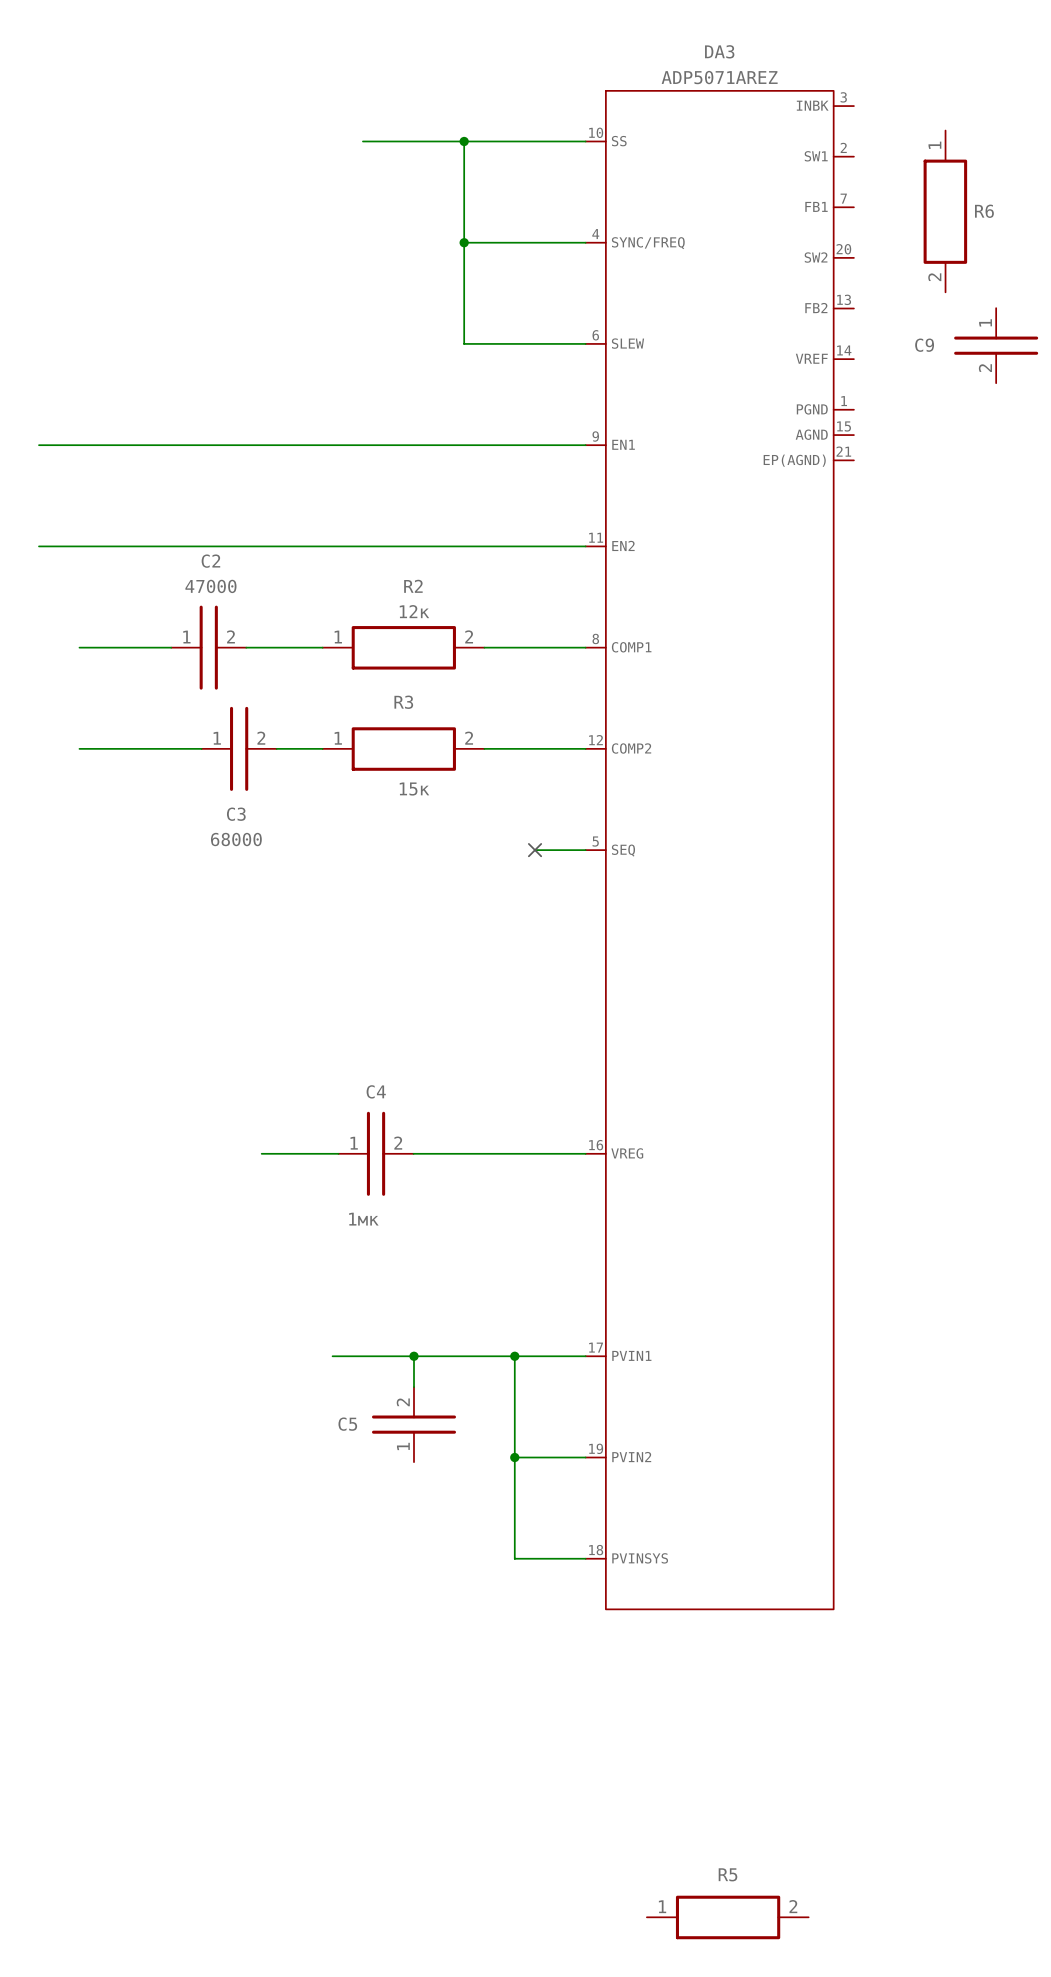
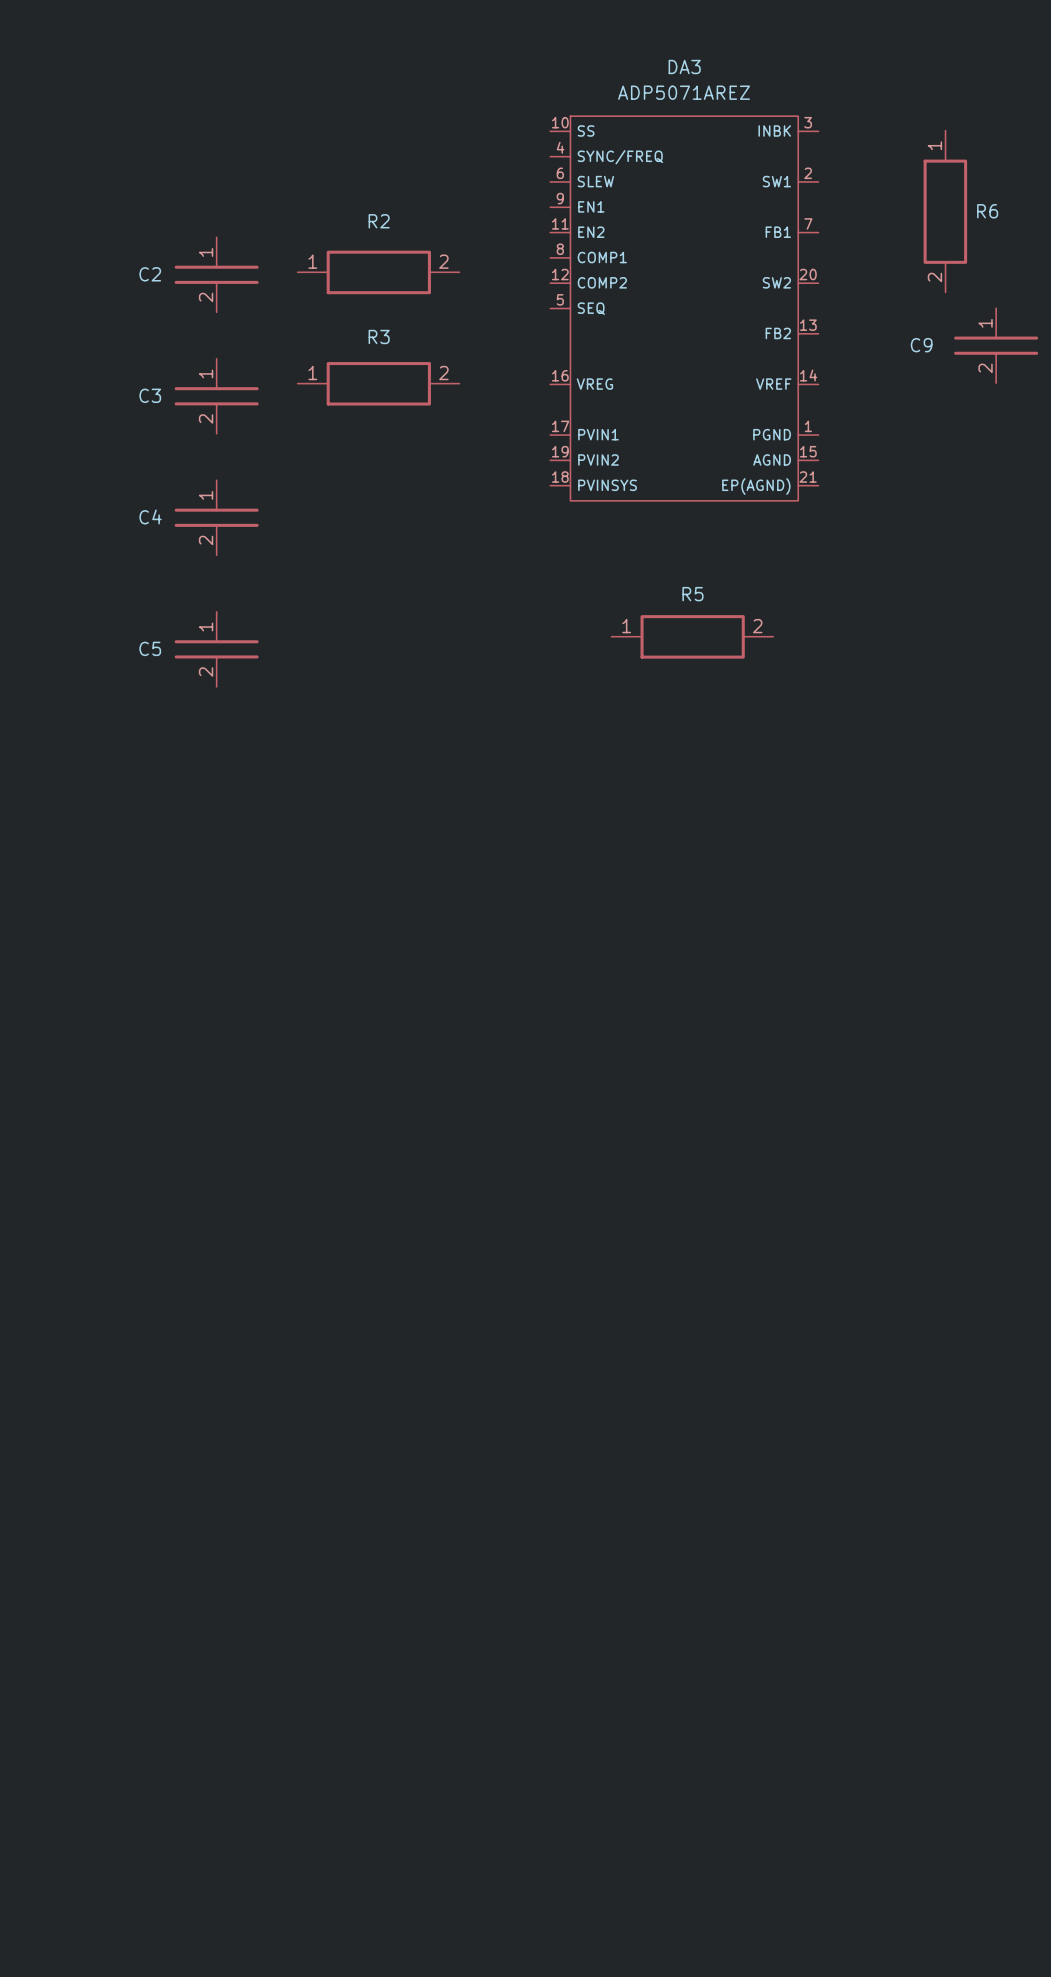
DA3 name position: DA3 (719, 51) -> DA3 (684, 67)
DA3 value position: ADP5071AREZ (719, 77) -> ADP5071AREZ (684, 92)
DA3 symbol: [585, 90, 854, 1610] -> [550, 116, 819, 501]
wire: (362, 141) (585, 141) -> none
wire: (464, 141) (464, 343) (585, 343) -> none
junction: (464, 141) -> none
wire: (464, 242) (585, 242) -> none
junction: (464, 242) -> none
wire: (38, 445) (585, 445) -> none
wire: (38, 546) (585, 546) -> none
C2 name position: C2 (210, 561) -> C2 (150, 274)
C2 value: 47000 (210, 586) -> none
R2 name position: R2 (413, 586) -> R2 (379, 221)
R2 value: 12к (414, 611) -> none
wire: (79, 647) (171, 647) -> none
C2 rotation: 0° (208, 647) -> 90° clockwise (216, 274)
C2 position: (208, 647) -> (216, 274)
wire: (246, 647) (322, 647) -> none
R2 position: (403, 647) -> (378, 272)
wire: (484, 647) (585, 647) -> none
wire: (79, 748) (201, 748) -> none
C3 rotation: 0° (239, 748) -> 90° clockwise (216, 396)
C3 position: (239, 748) -> (216, 396)
wire: (276, 748) (322, 748) -> none
wire: (484, 748) (585, 748) -> none
R3 position: (403, 749) -> (378, 383)
R3 value: 15к (414, 789) -> none
C3 value: 68000 (236, 839) -> none
wire: (535, 850) (585, 850) -> none
no-connect mark: (535, 850) -> none
C4 name position: C4 (376, 1091) -> C4 (150, 516)
wire: (261, 1153) (338, 1153) -> none
C4 rotation: 0° (376, 1153) -> 90° clockwise (216, 517)
C4 position: (376, 1153) -> (216, 517)
wire: (413, 1153) (585, 1153) -> none
C4 value: 1мк (363, 1219) -> none
wire: (332, 1356) (585, 1356) -> none
wire: (413, 1356) (413, 1387) -> none
junction: (413, 1356) -> none
wire: (514, 1356) (514, 1558) (585, 1558) -> none
junction: (514, 1356) -> none
C5 rotation: 0° (413, 1424) -> 180° (216, 649)
C5 position: (413, 1424) -> (216, 649)
wire: (514, 1457) (585, 1457) -> none
junction: (514, 1457) -> none
R5 position: (727, 1917) -> (692, 636)

